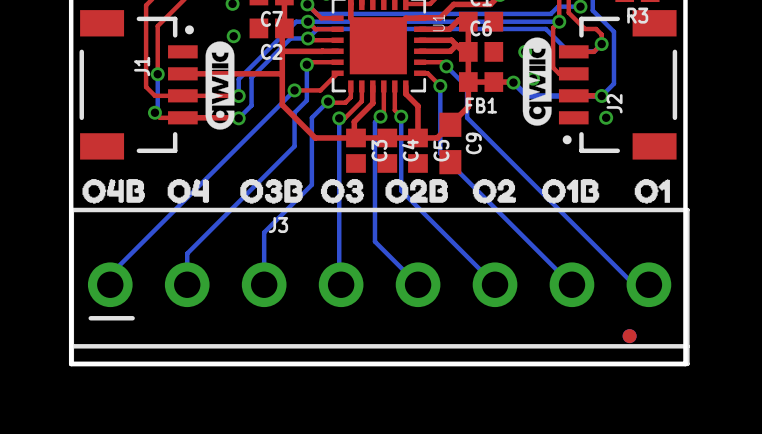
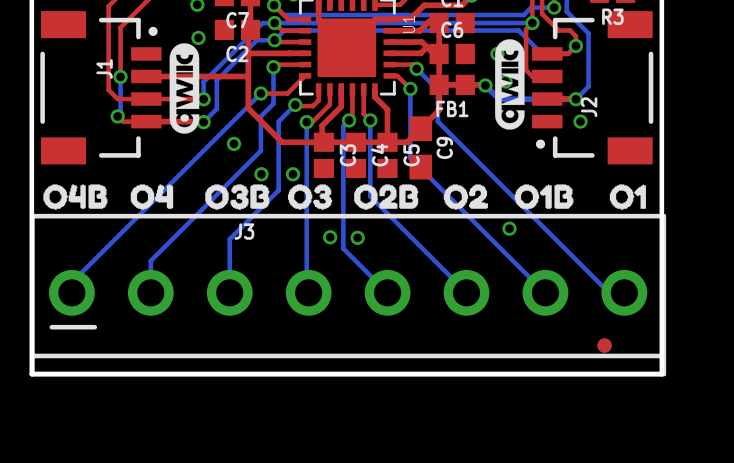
via: none -> (233, 143)
via: none -> (261, 174)
via: none -> (292, 174)
via: none -> (509, 228)
via: none -> (330, 237)
via: none -> (357, 237)

